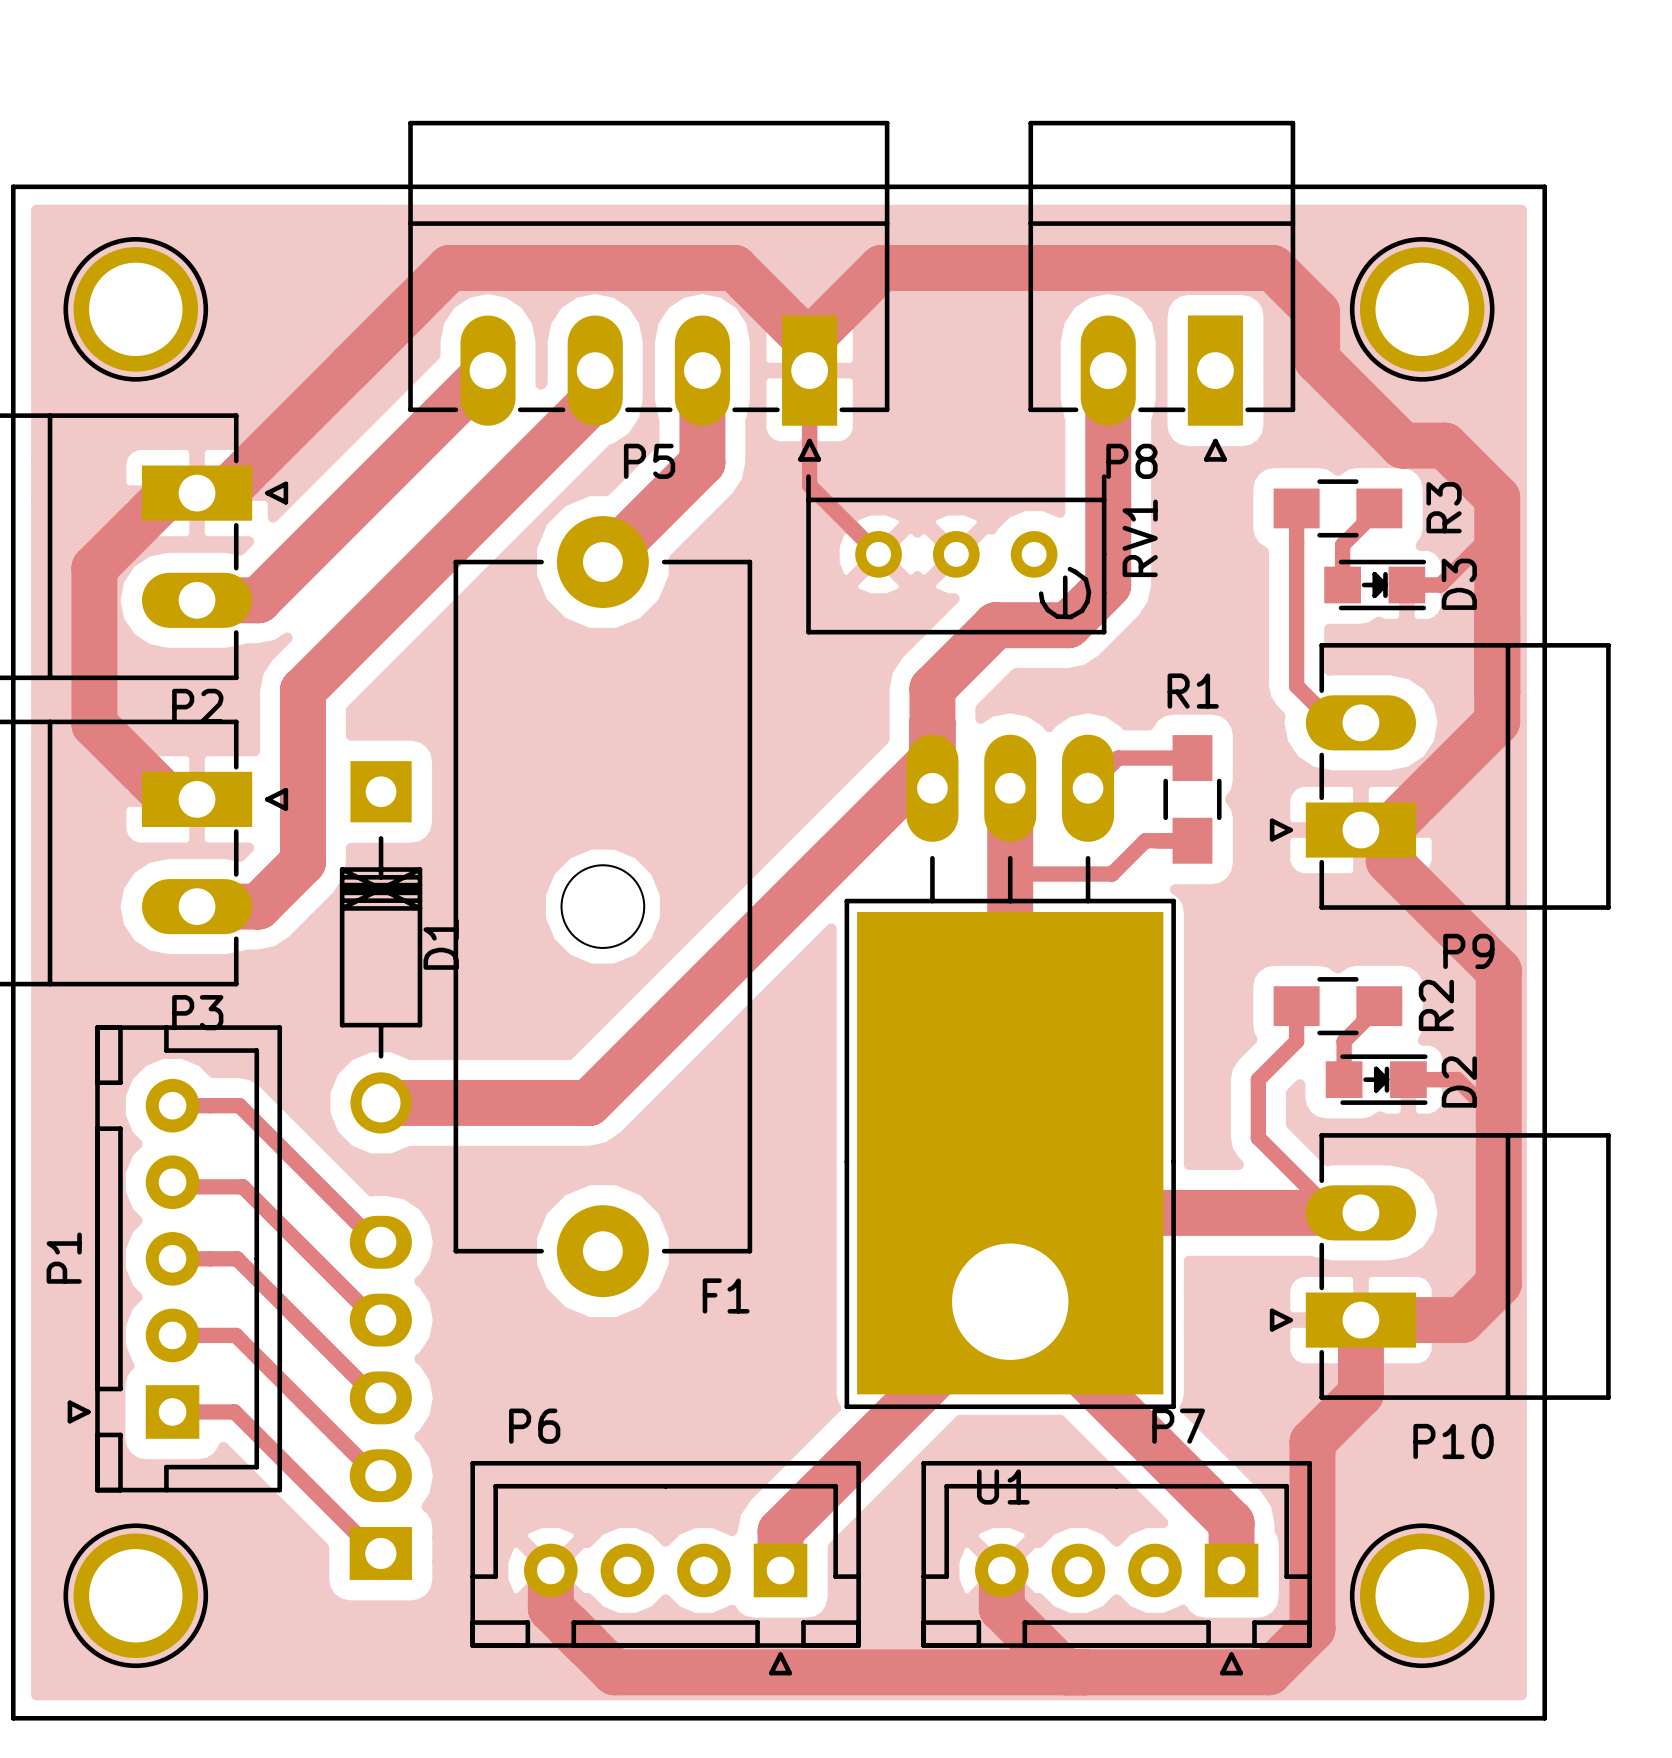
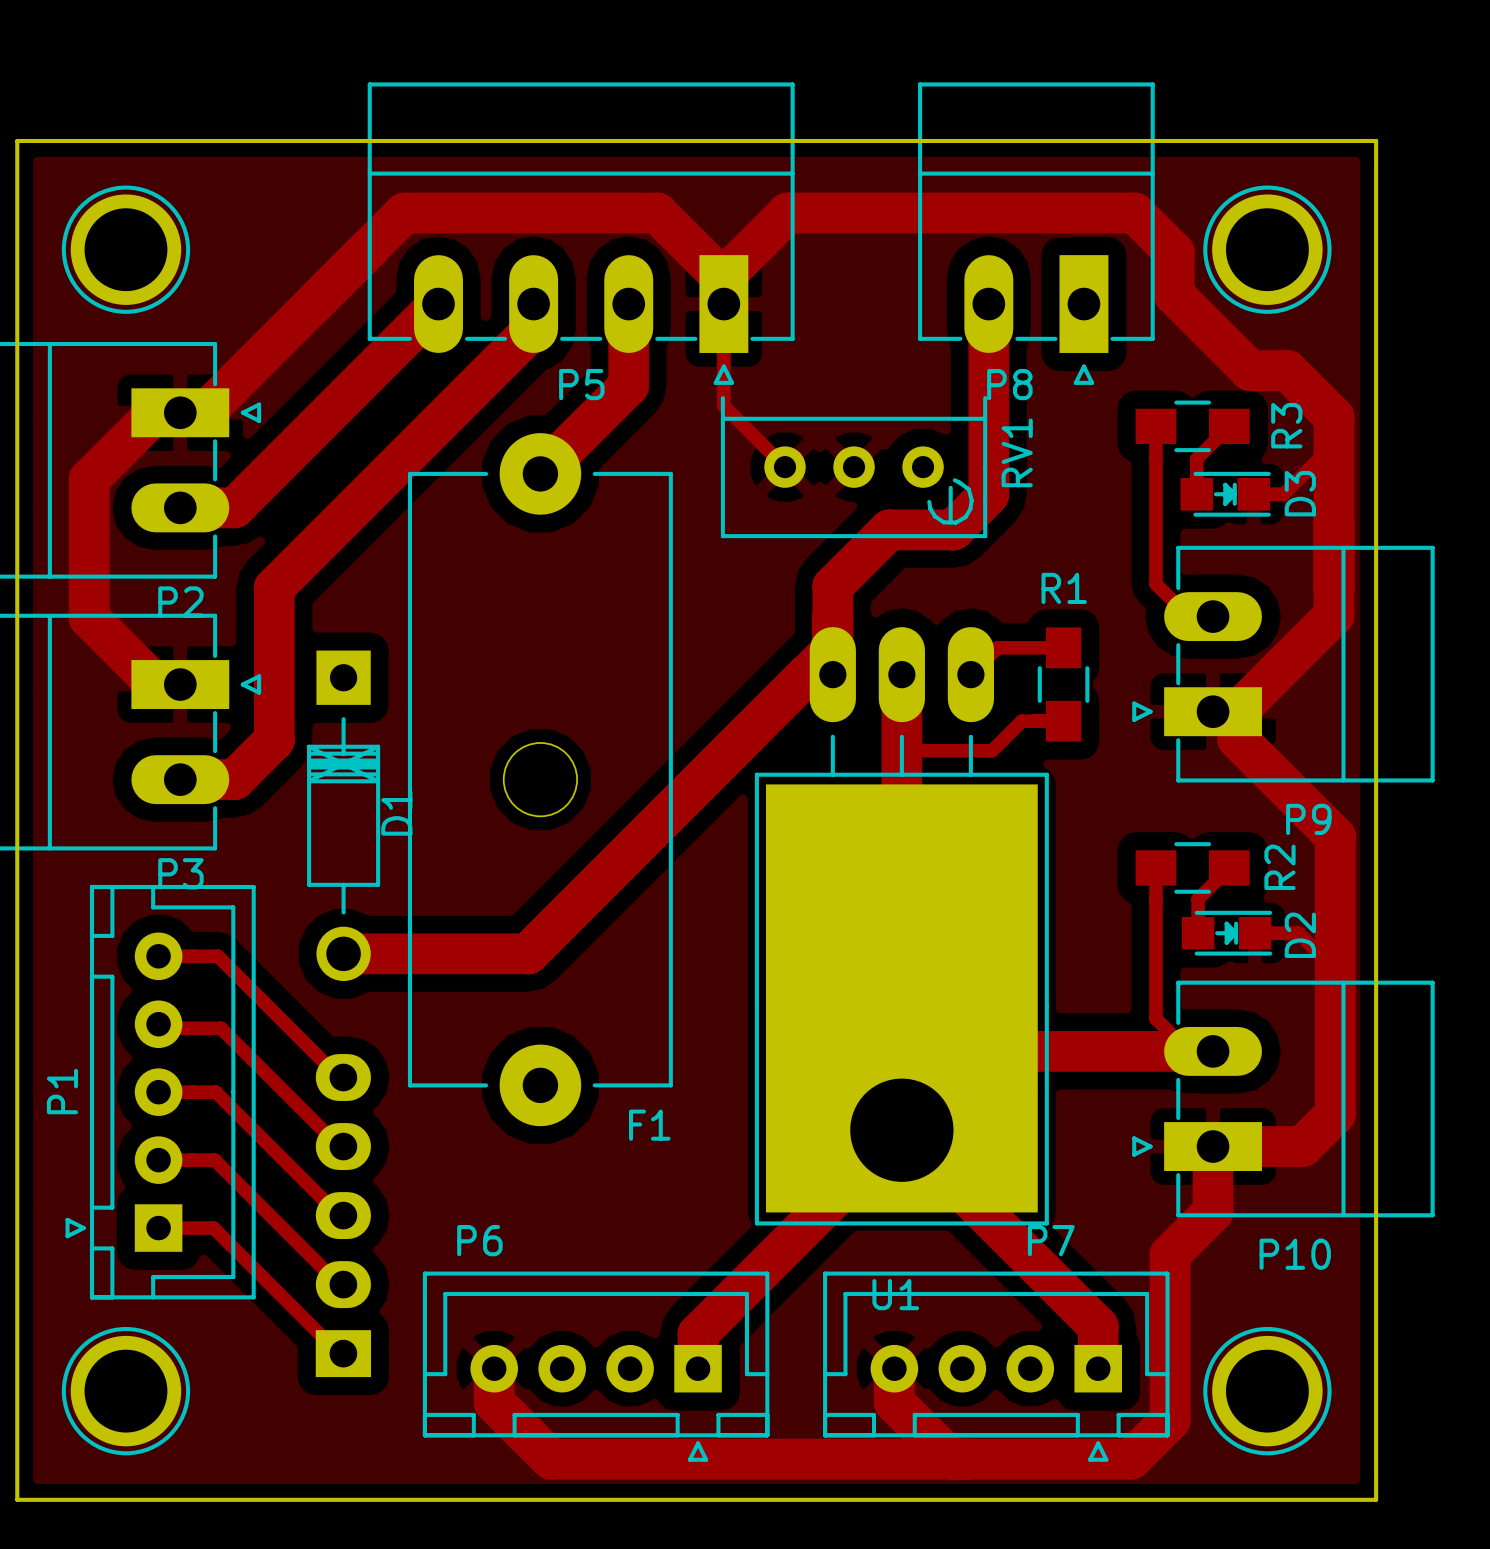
track: (1296, 1041) (1258, 1079) (1258, 1137) (1296, 1176) -> (1155, 899) (1155, 1018)

